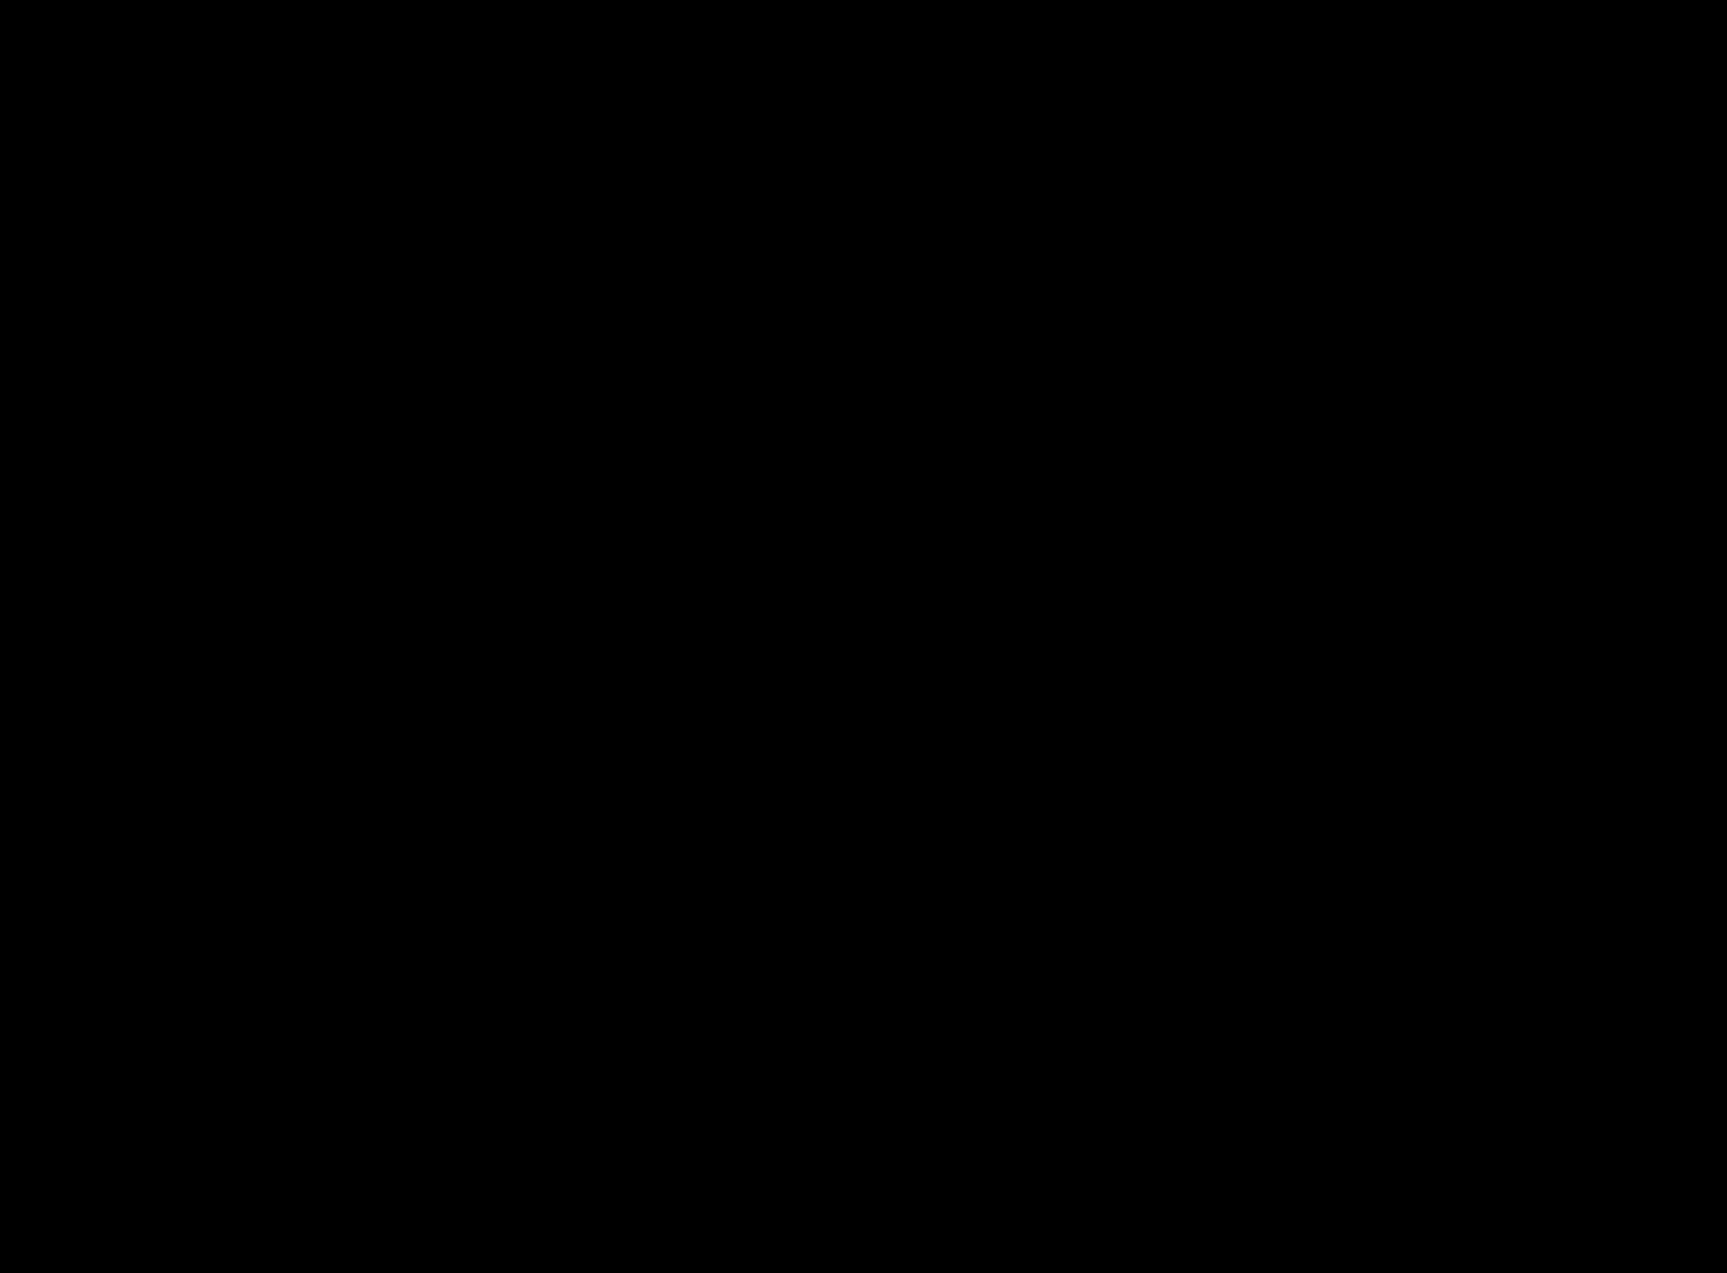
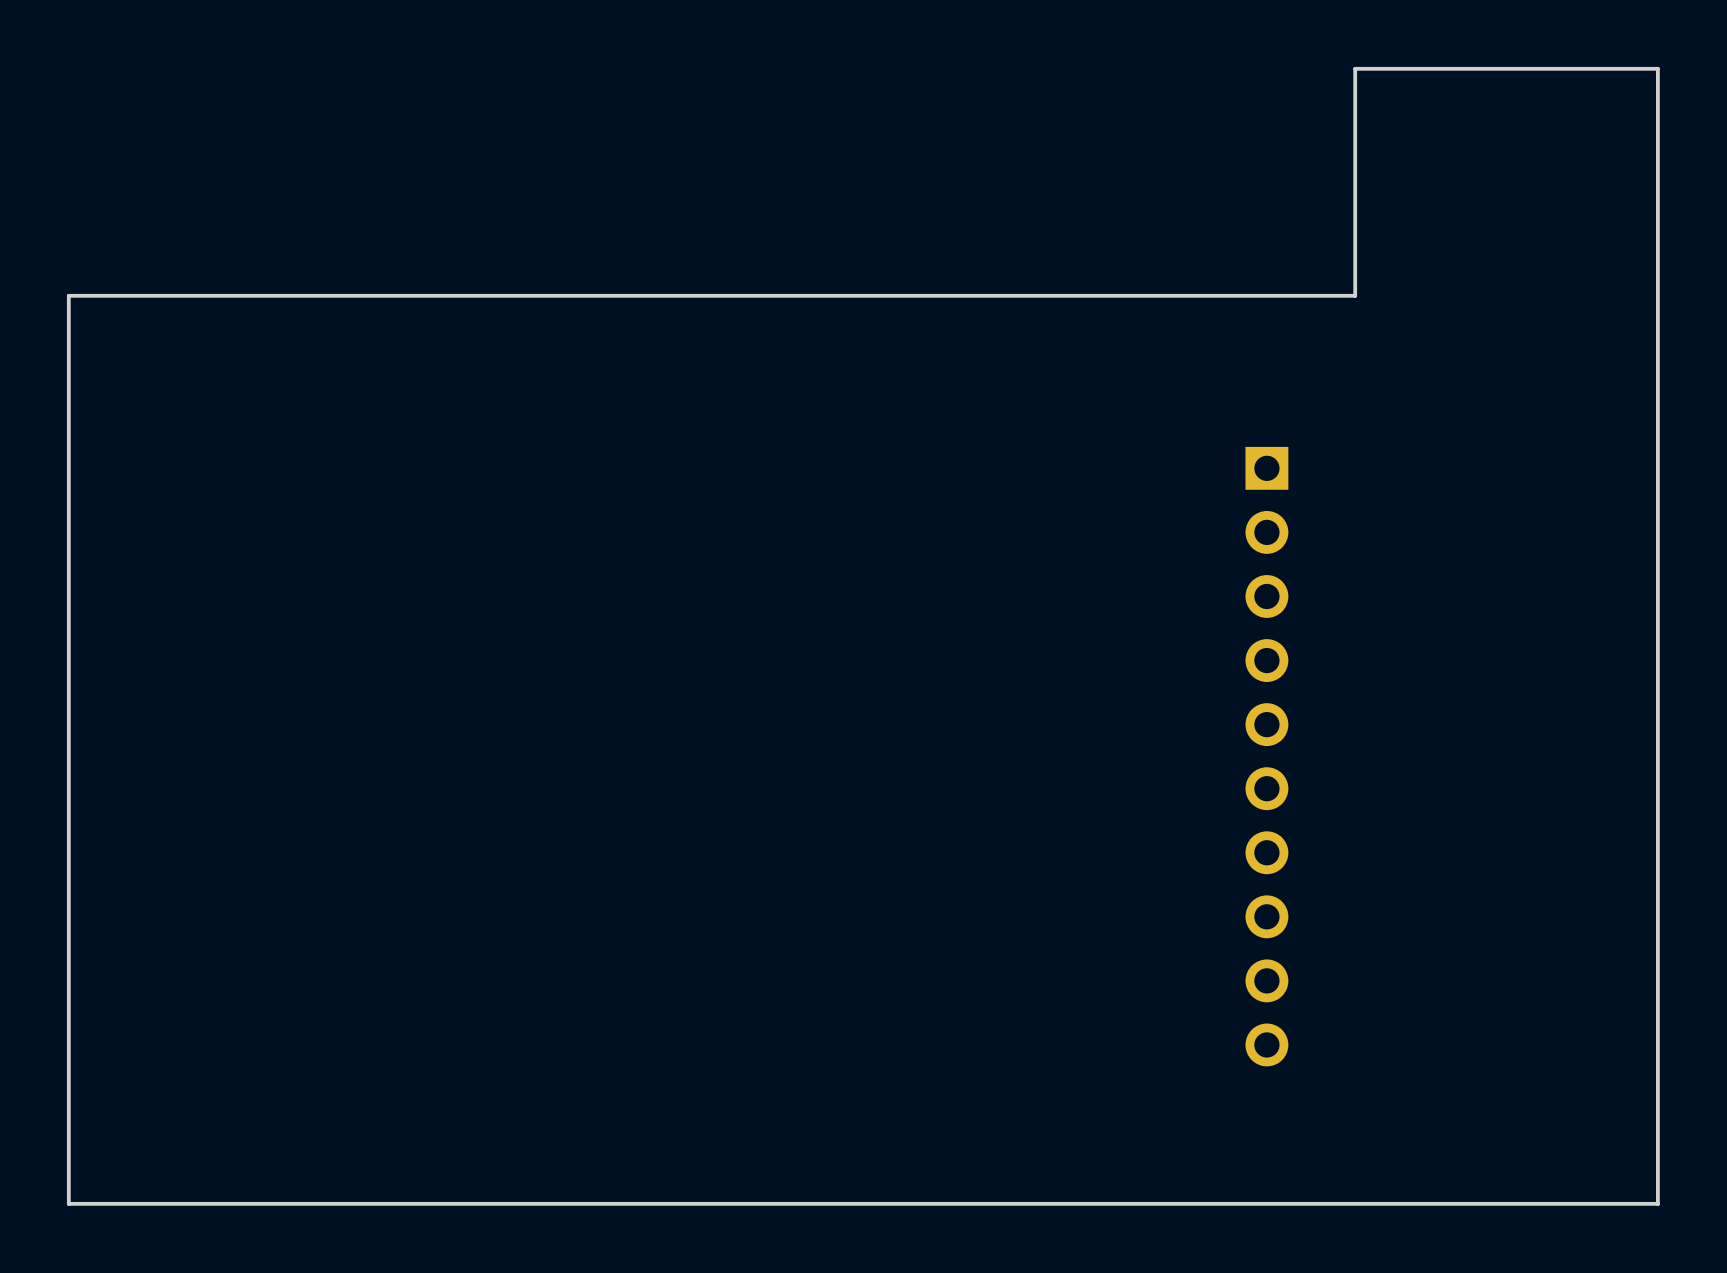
board edge: none -> (1657, 68) (1355, 68) (1355, 295) (68, 295) (68, 1203) (1657, 1203) (1657, 68)
part: none -> (1266, 756)

